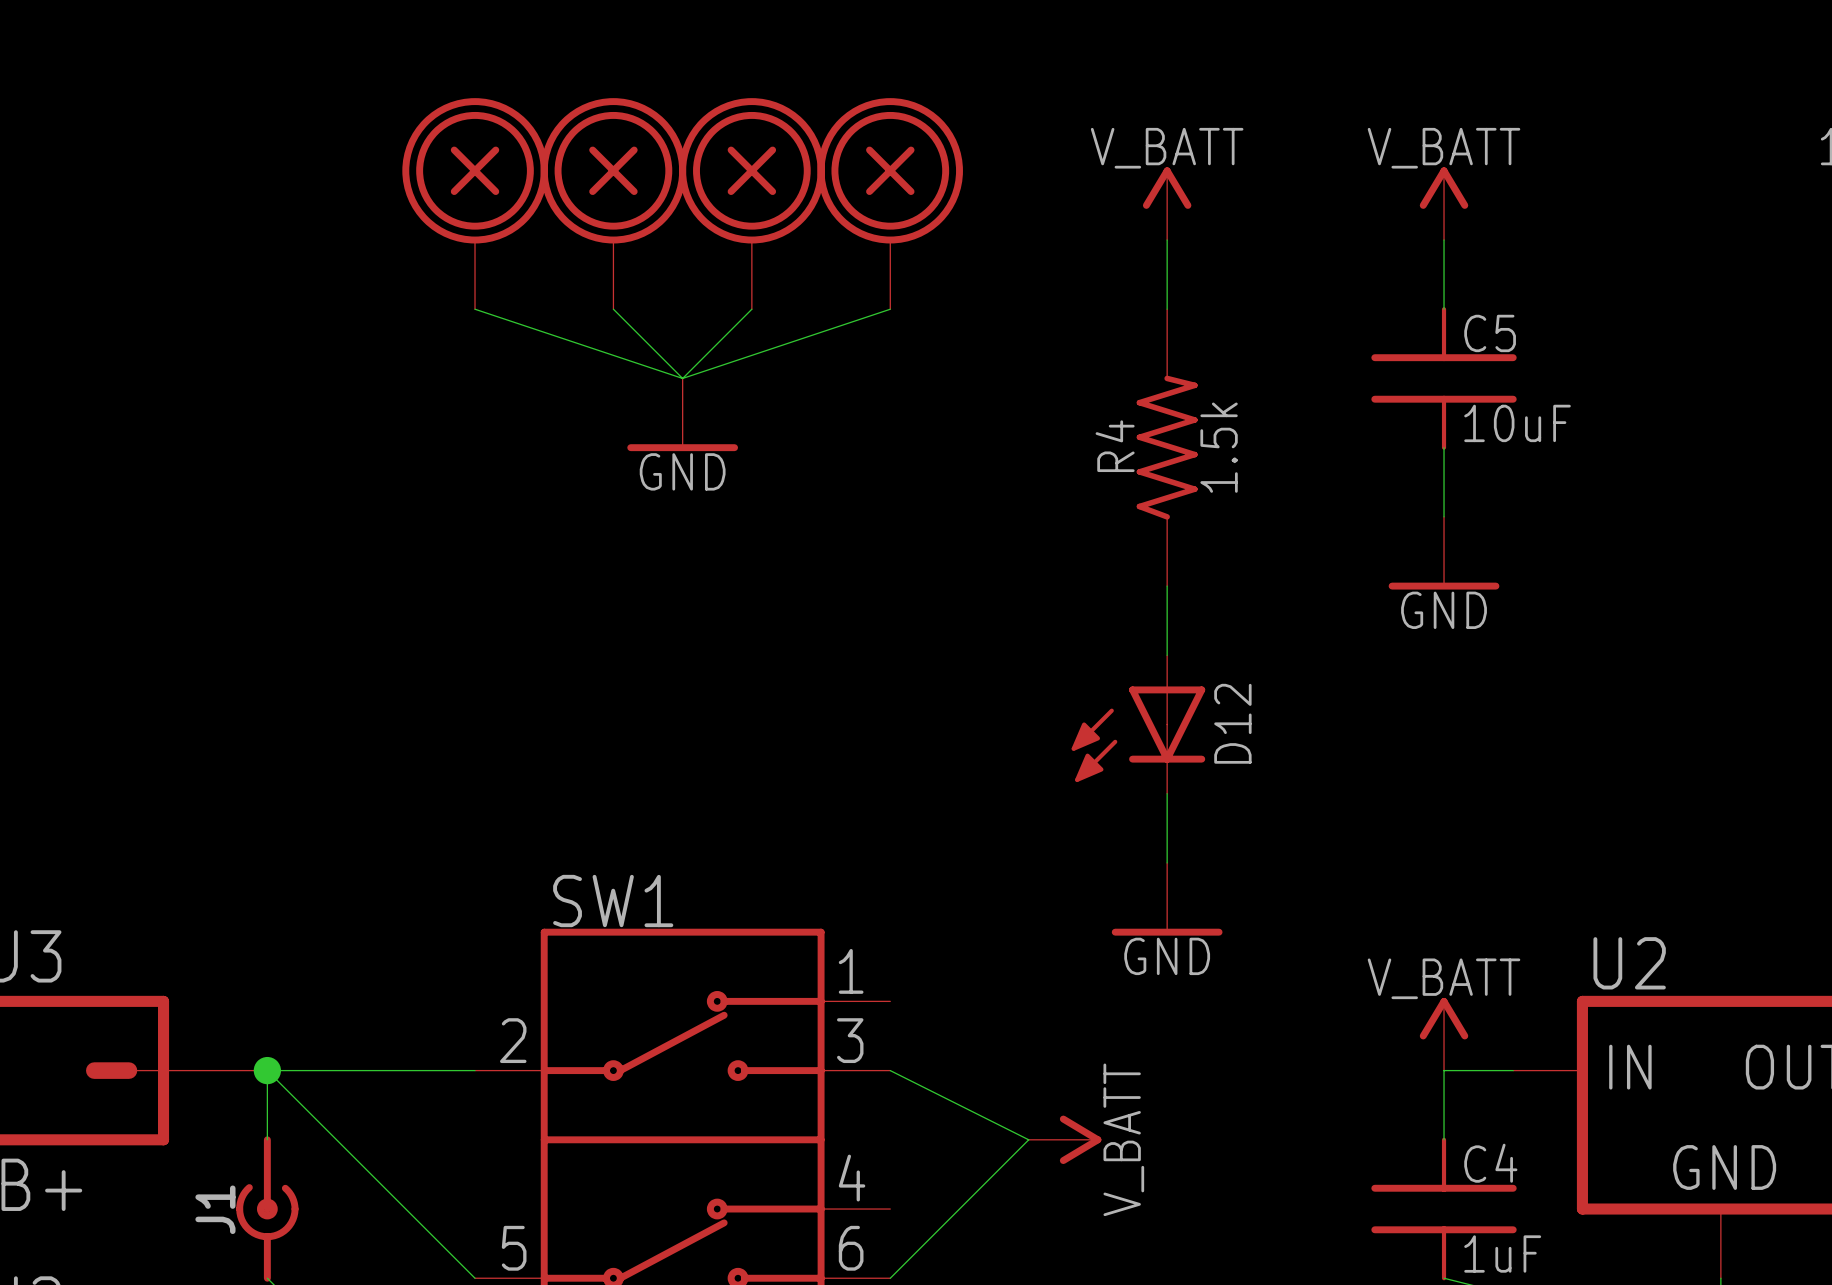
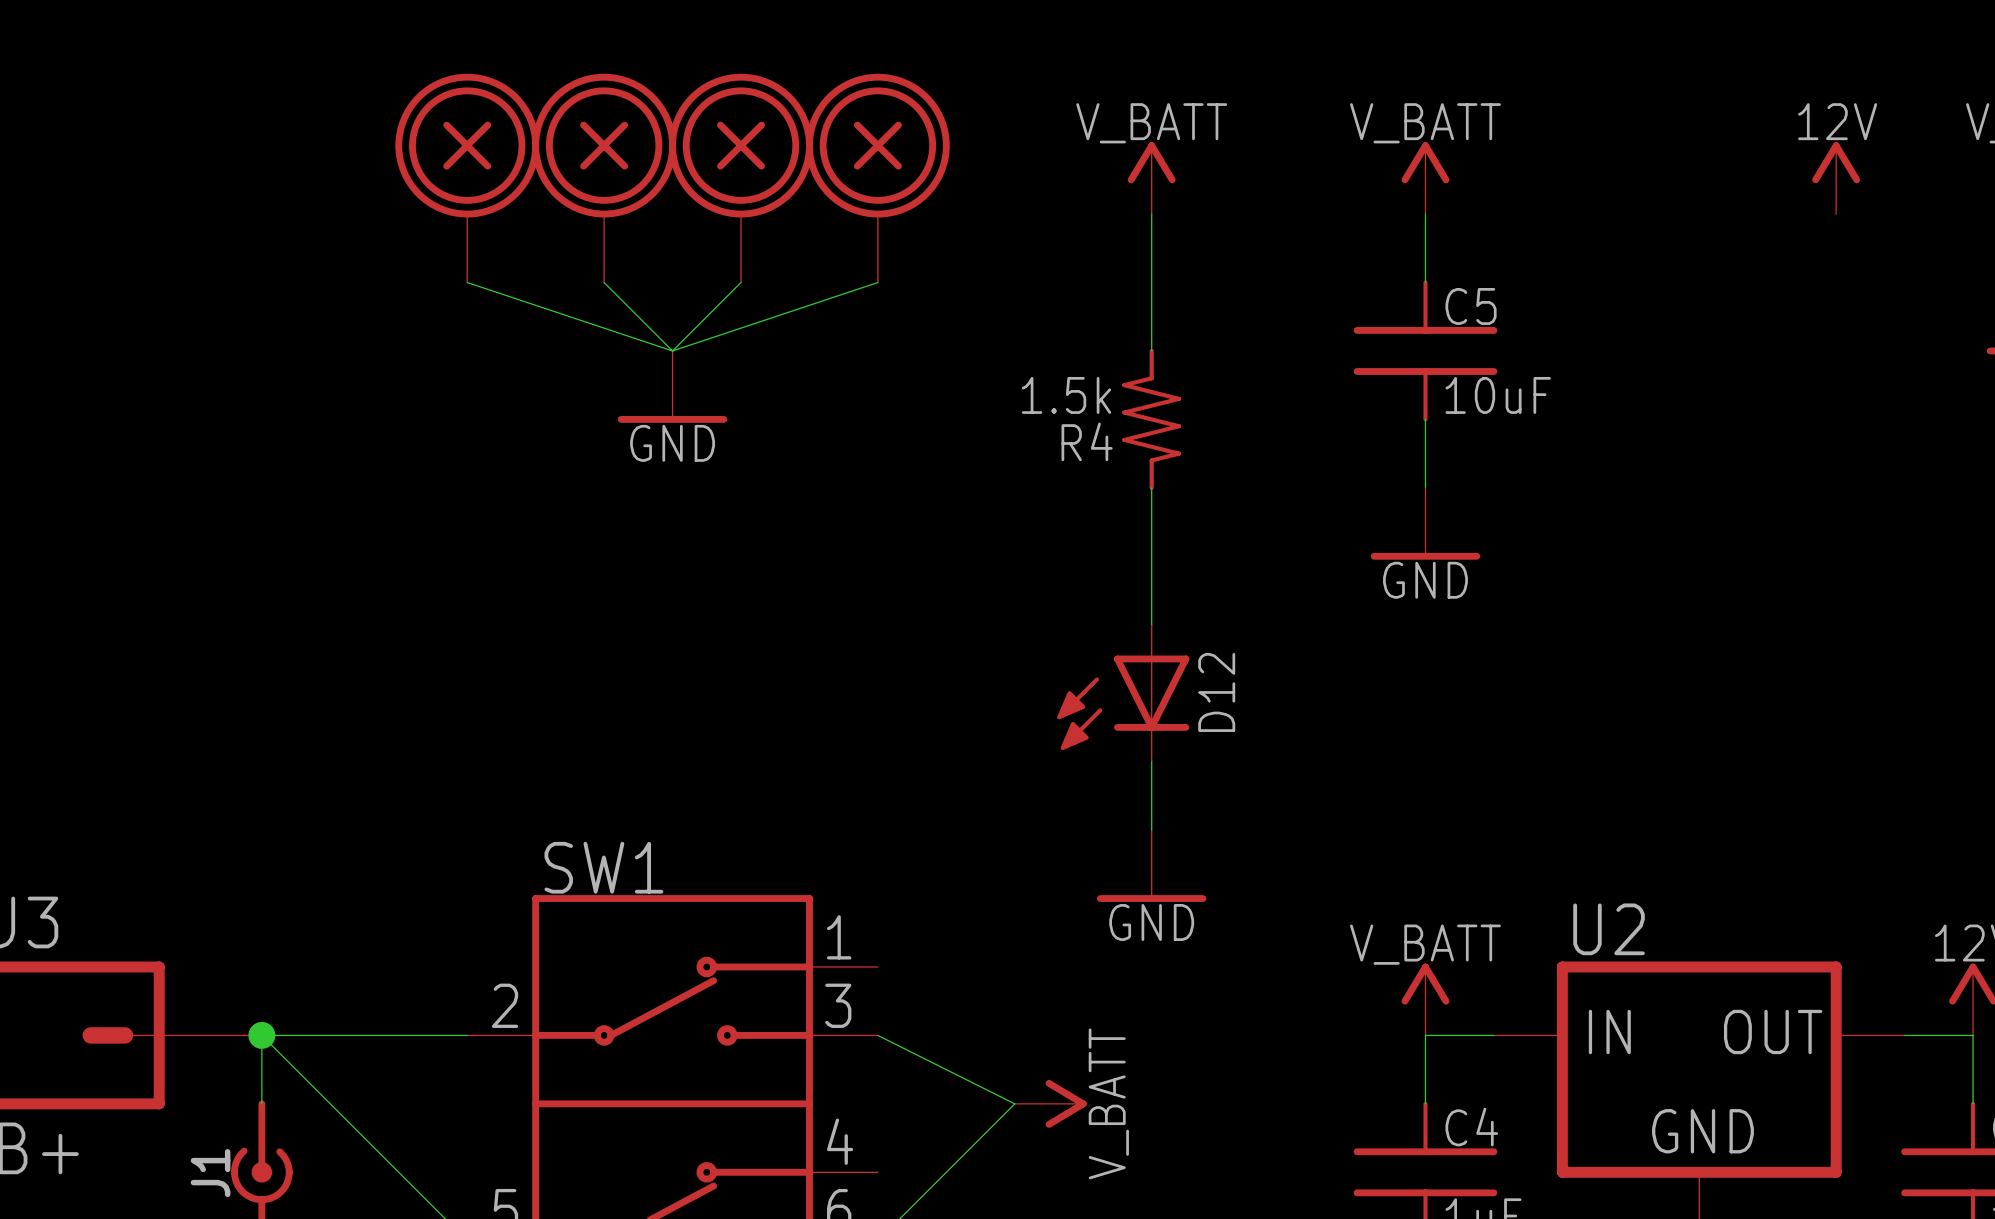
R4 symbol: [1136, 309, 1198, 587] -> [1122, 348, 1182, 490]
R4 value position: 1.5k (1219, 447) -> 1.5k (1066, 395)

